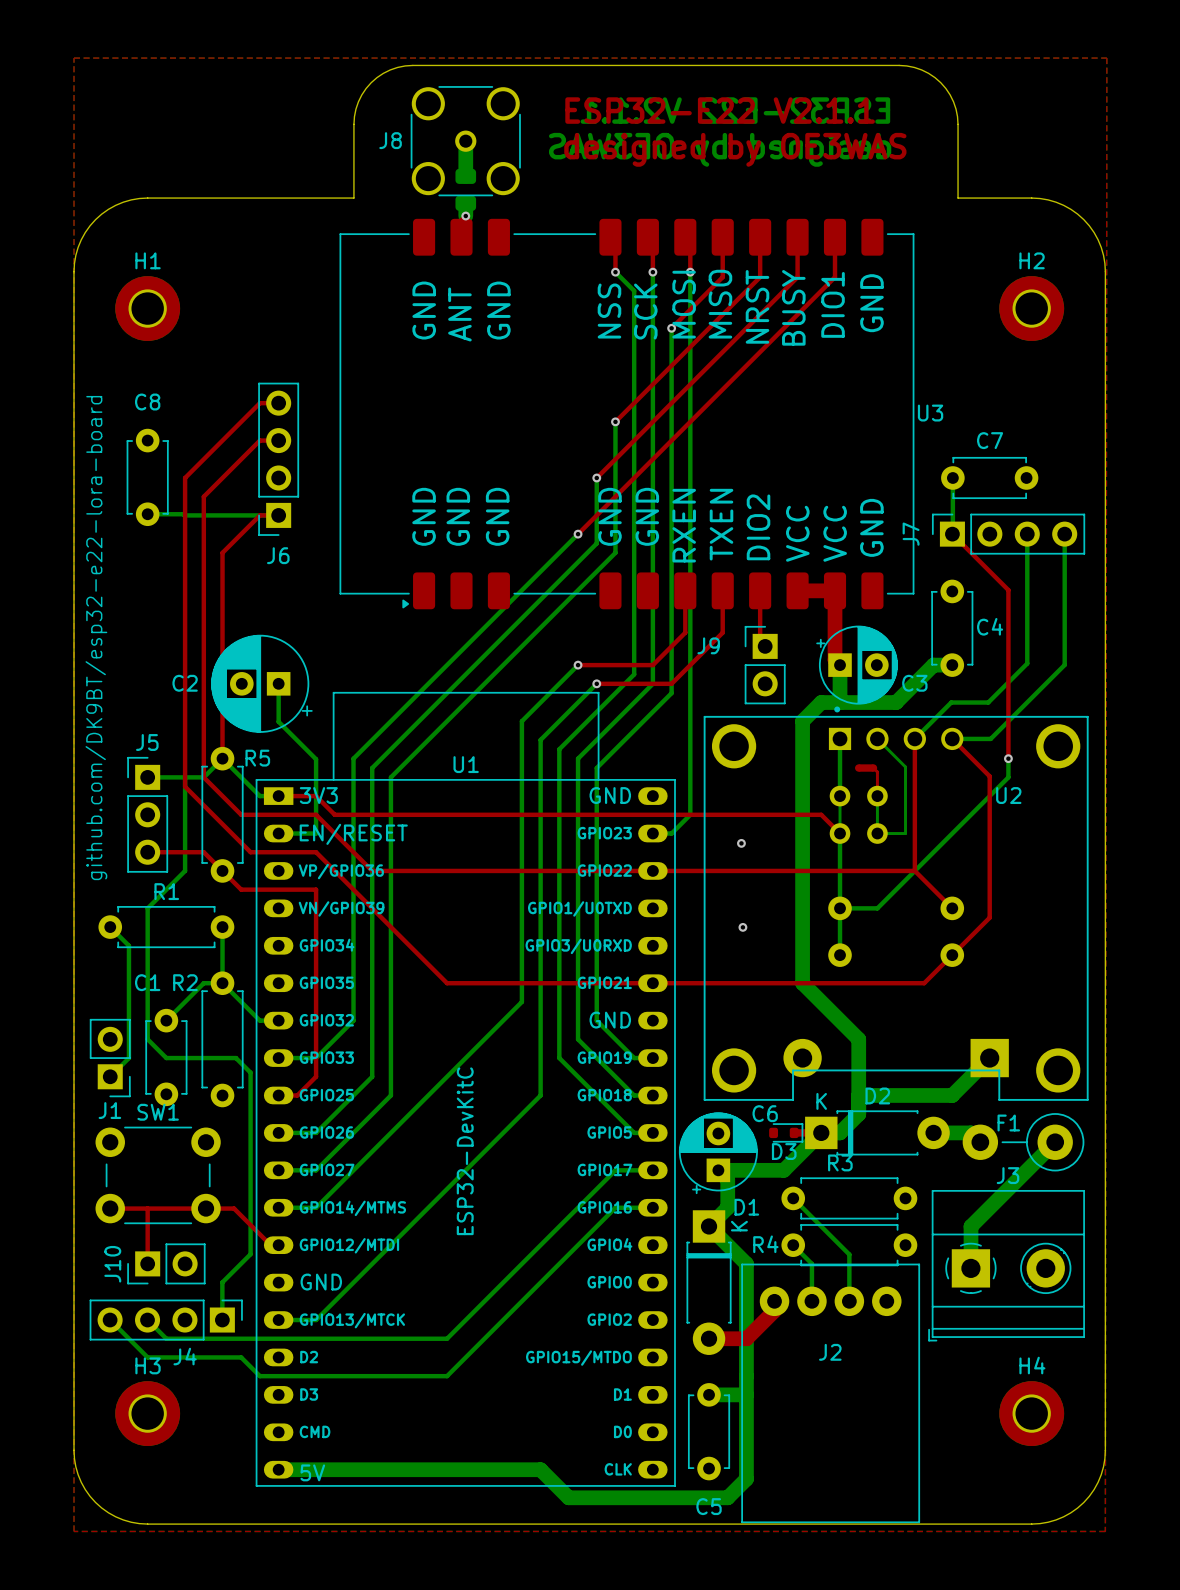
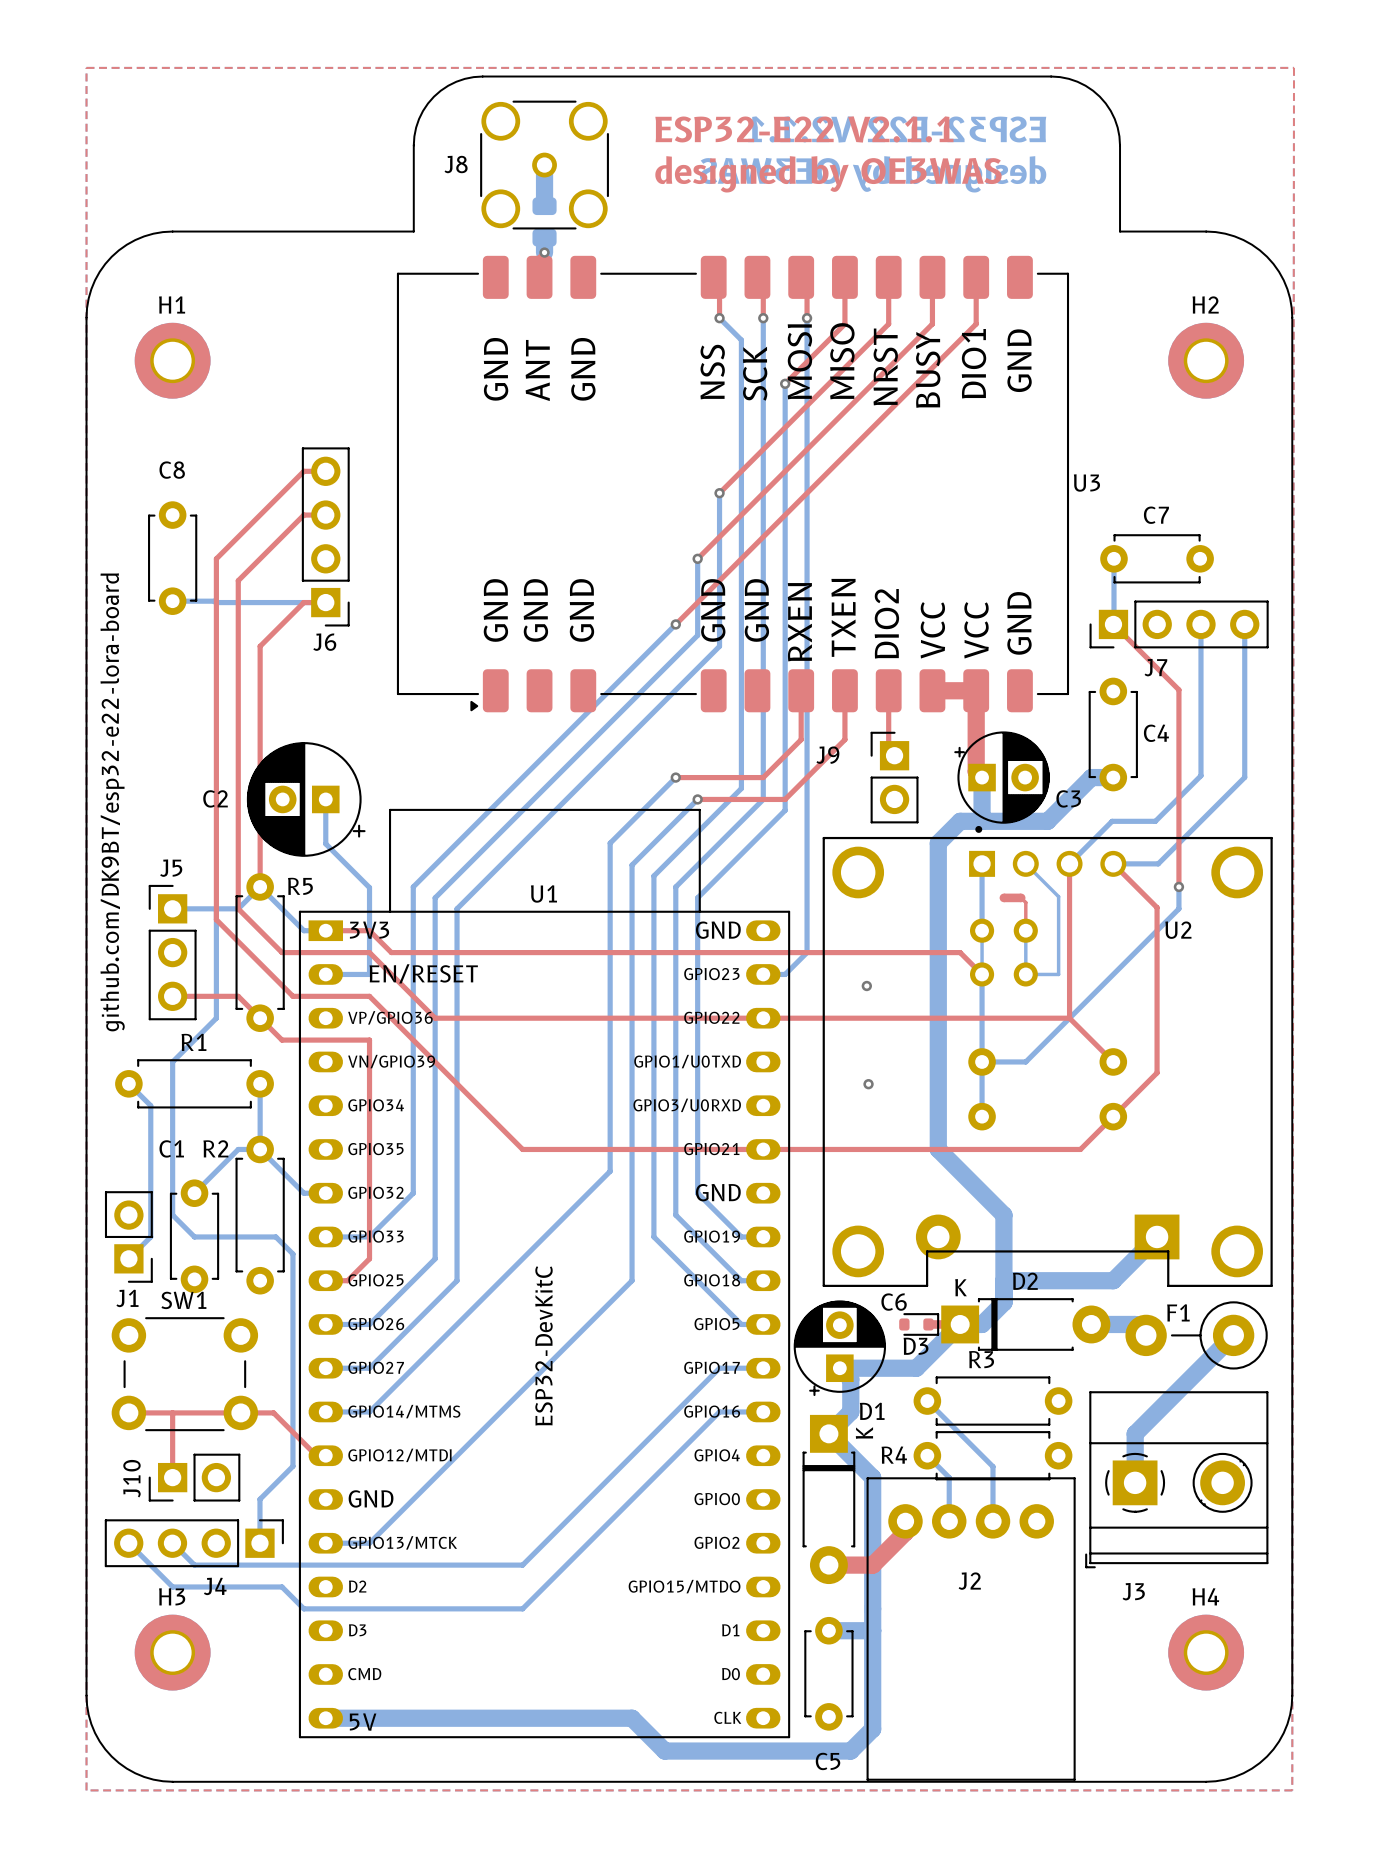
J6 footprint: [258, 382, 300, 536] -> [301, 447, 350, 627]
J7 footprint: [931, 513, 1086, 555] -> [1089, 600, 1269, 649]
J7 name position: J7 (911, 534) -> J7 (1155, 667)
J3 name position: J3 (1008, 1175) -> J3 (1133, 1591)

